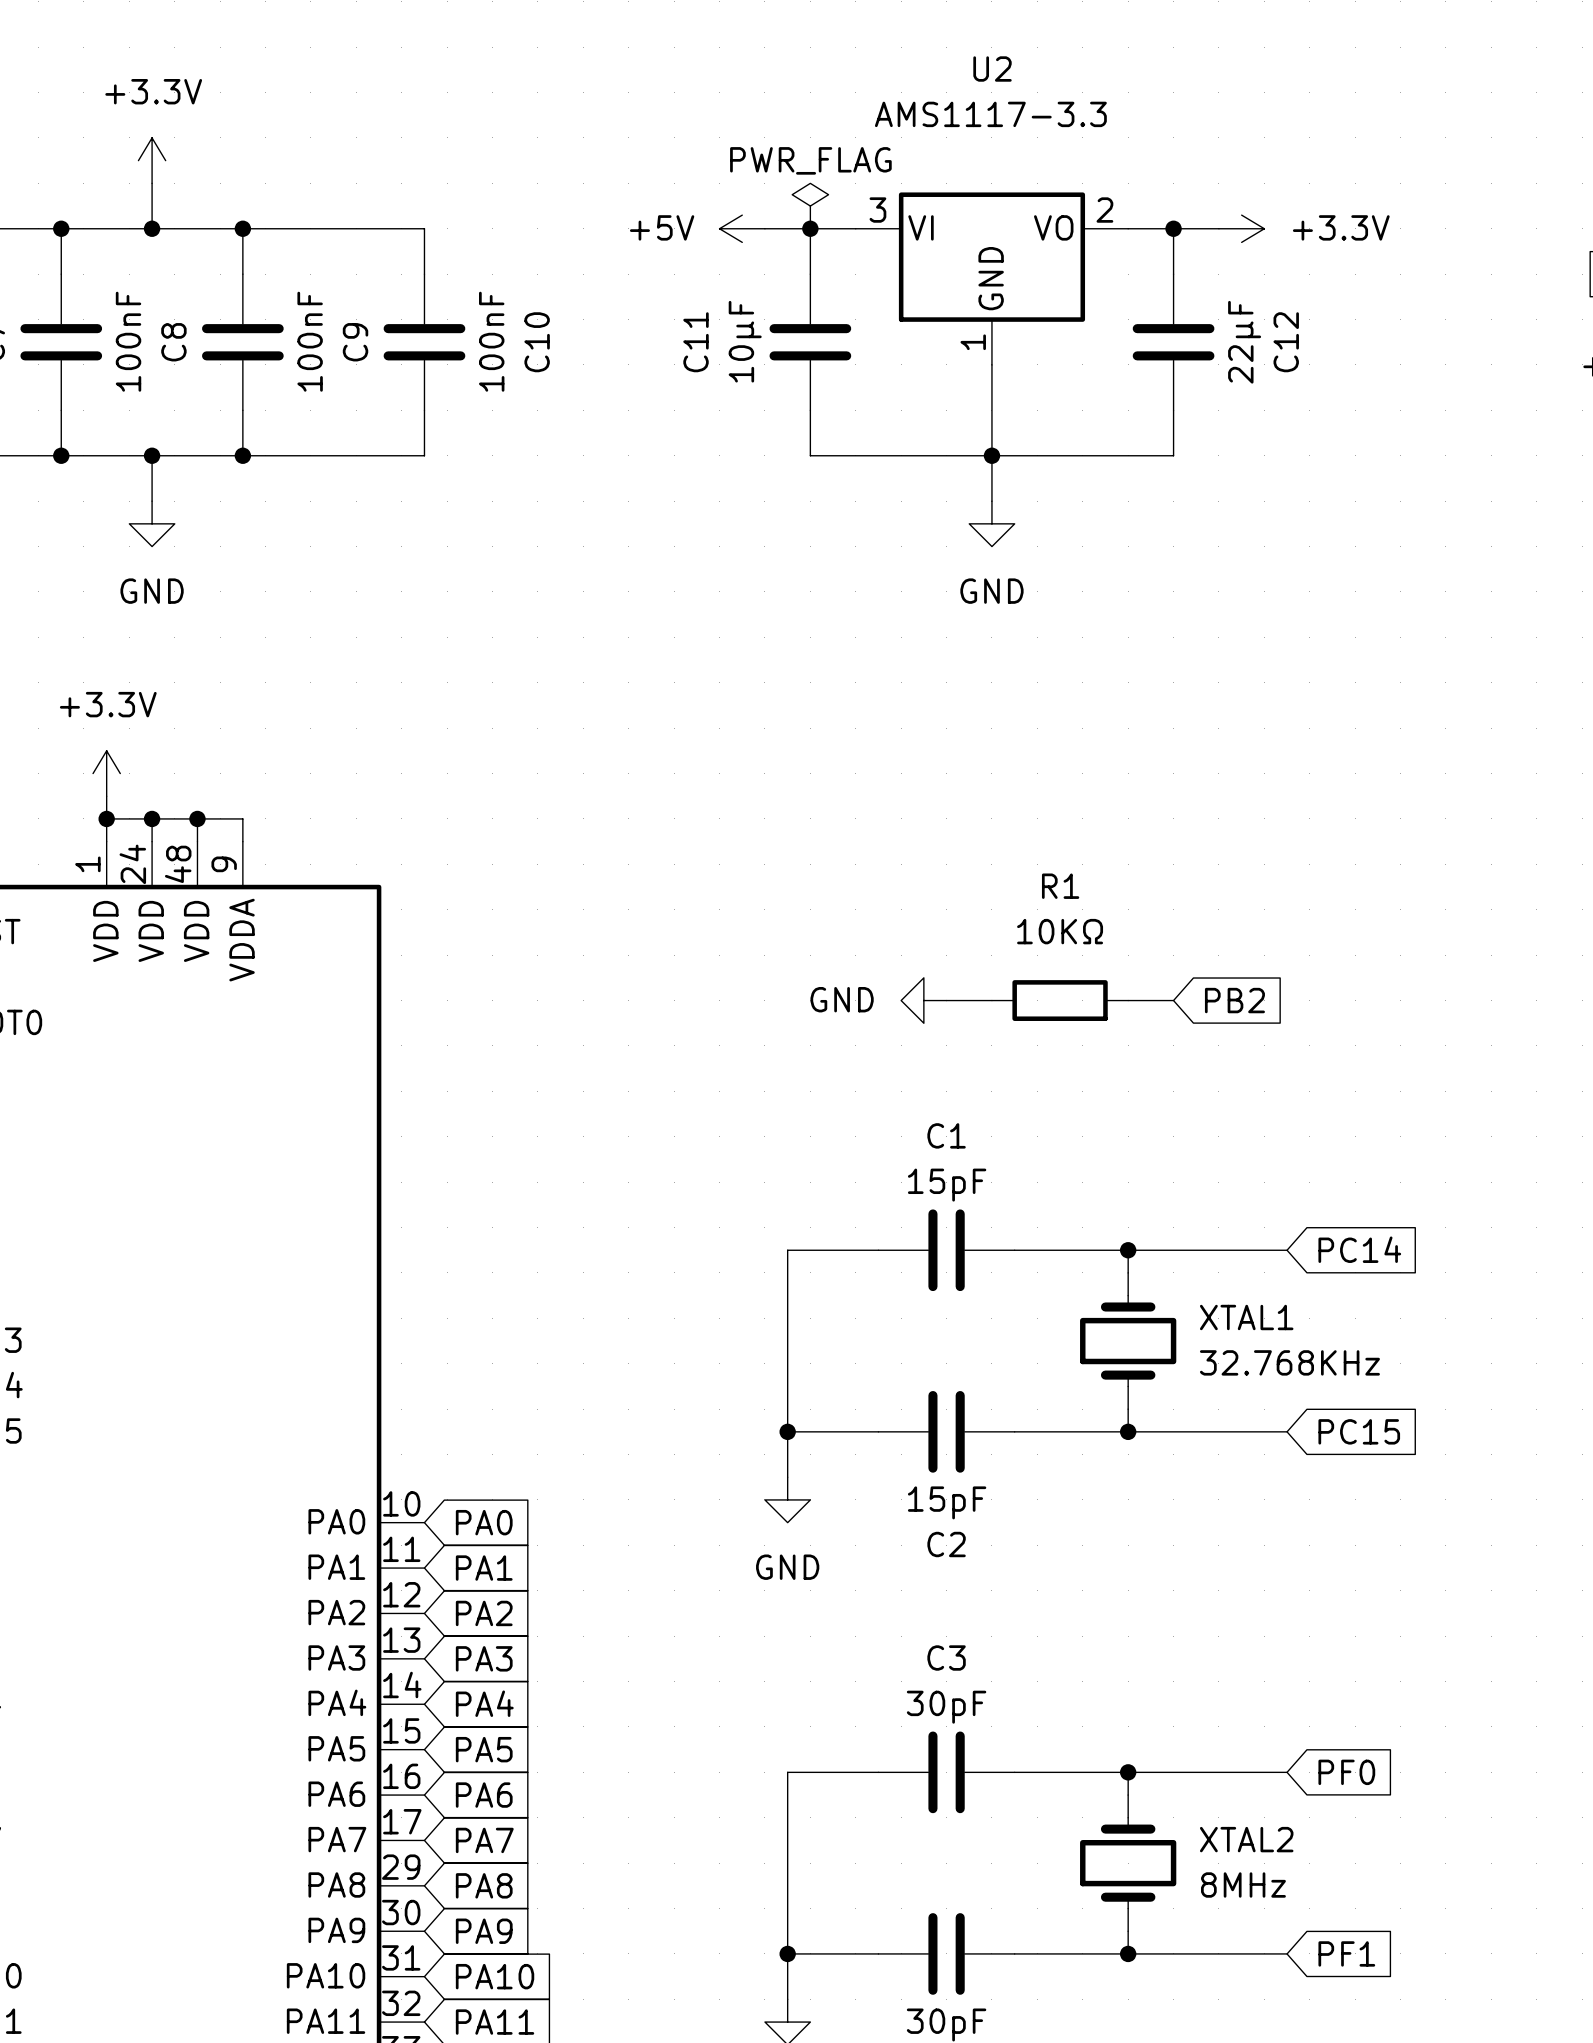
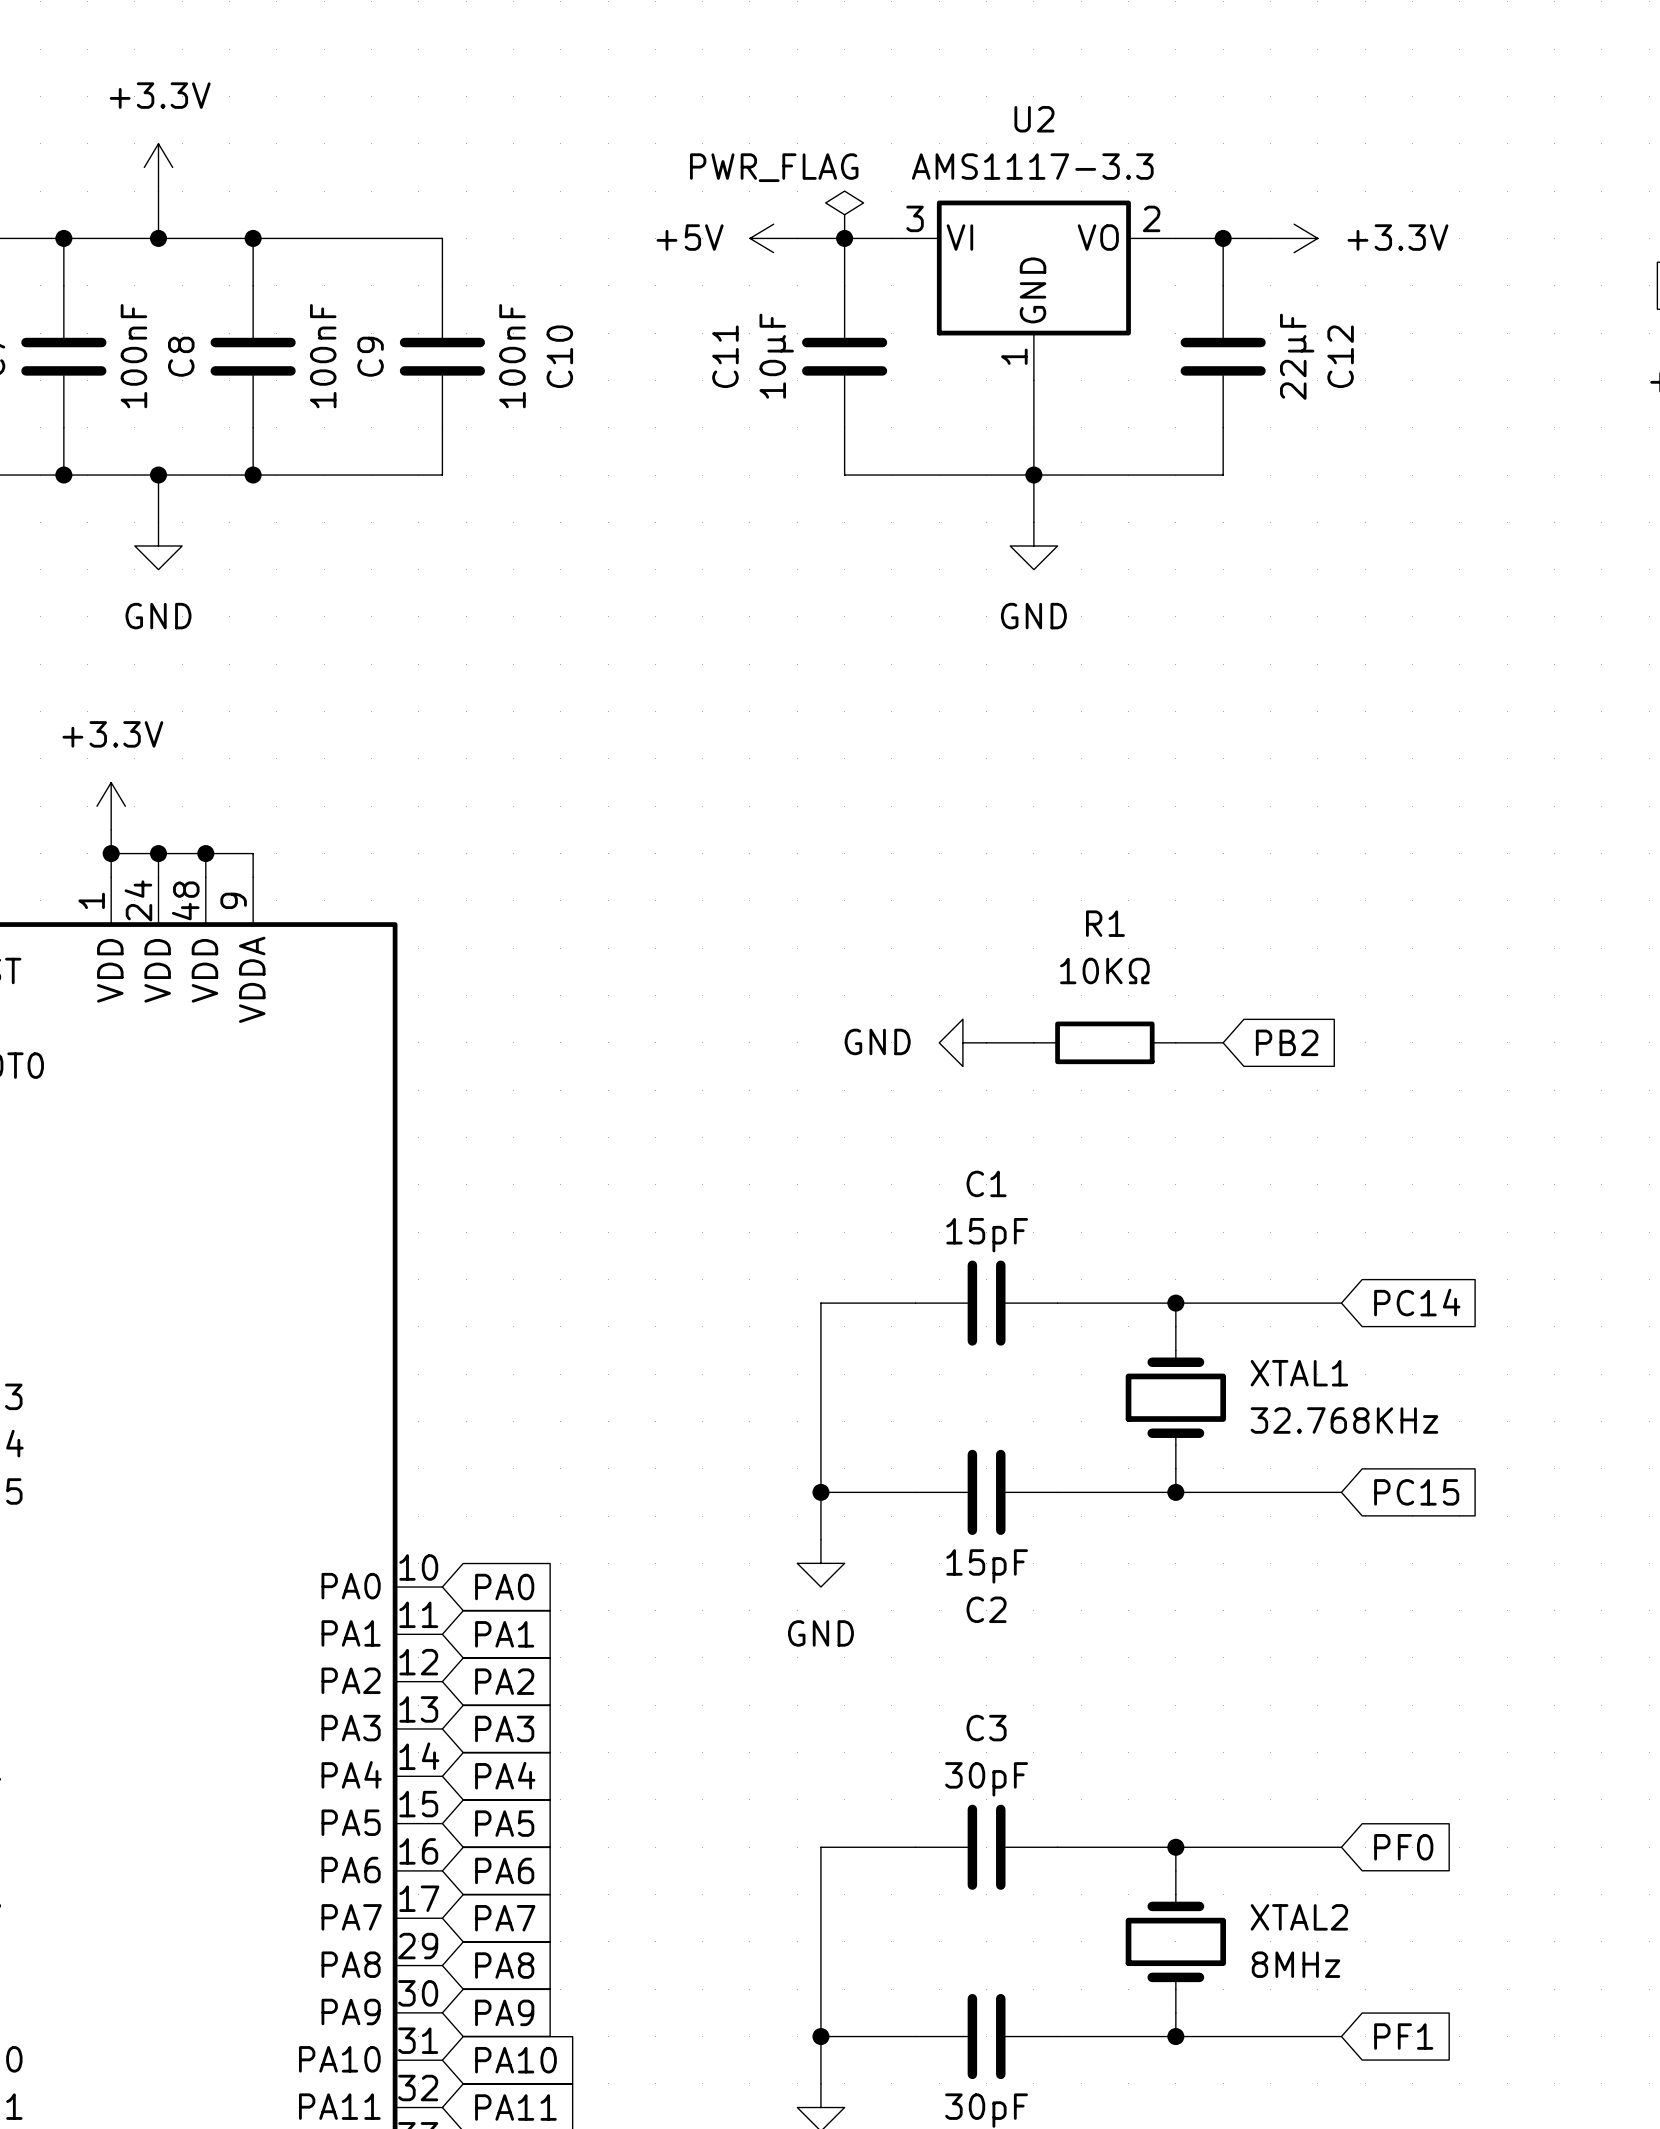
U2 name position: U2 (992, 69) -> U2 (1034, 119)
U2 value position: AMS1117-3.3 (990, 114) -> AMS1117-3.3 (1032, 166)
power symbol text position: PWR_FLAG (810, 160) -> PWR_FLAG (774, 167)

